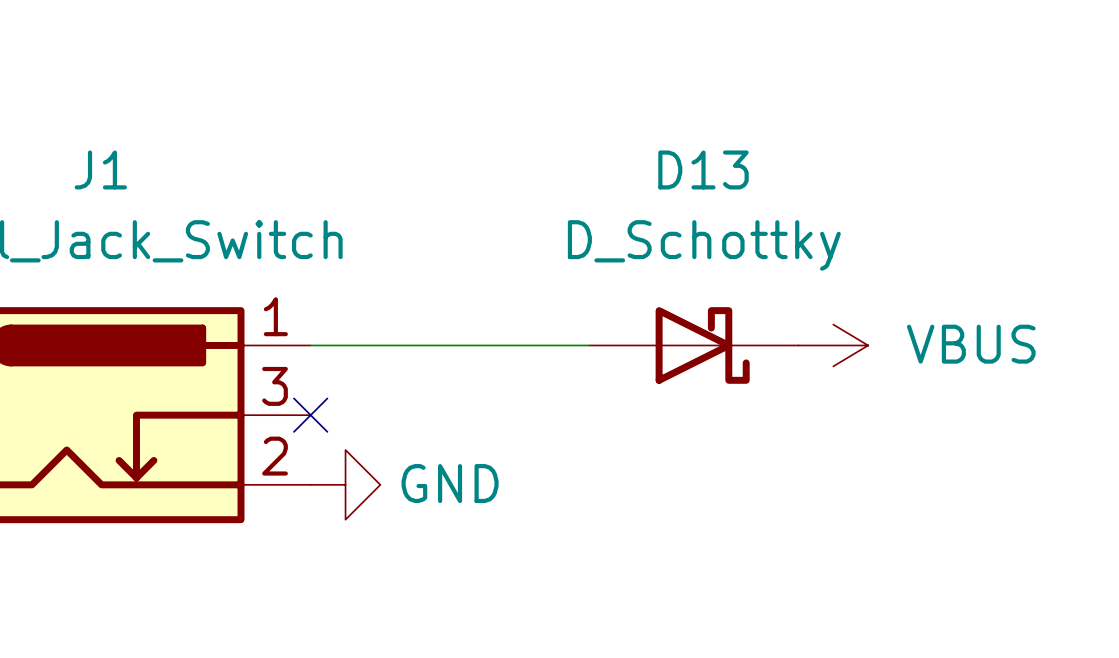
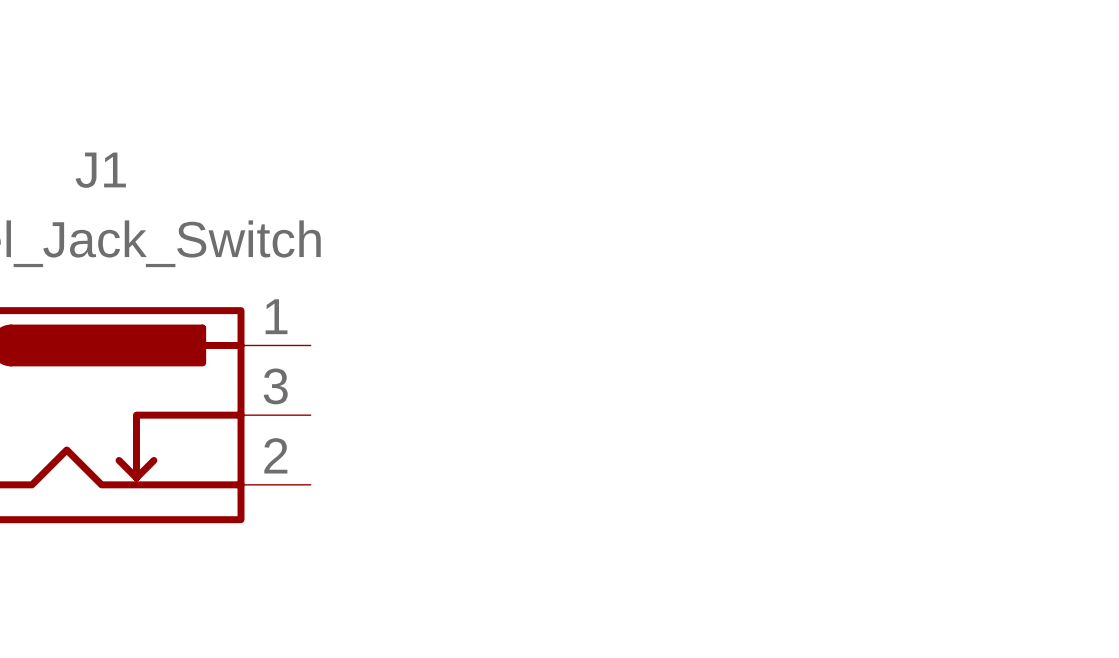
wire: (310, 345) (589, 345) -> none
D13: D_Schottky (693, 345) -> none
power symbol: VBUS (833, 345) -> none
no-connect mark: (310, 415) -> none
power symbol: GND (345, 484) -> none

